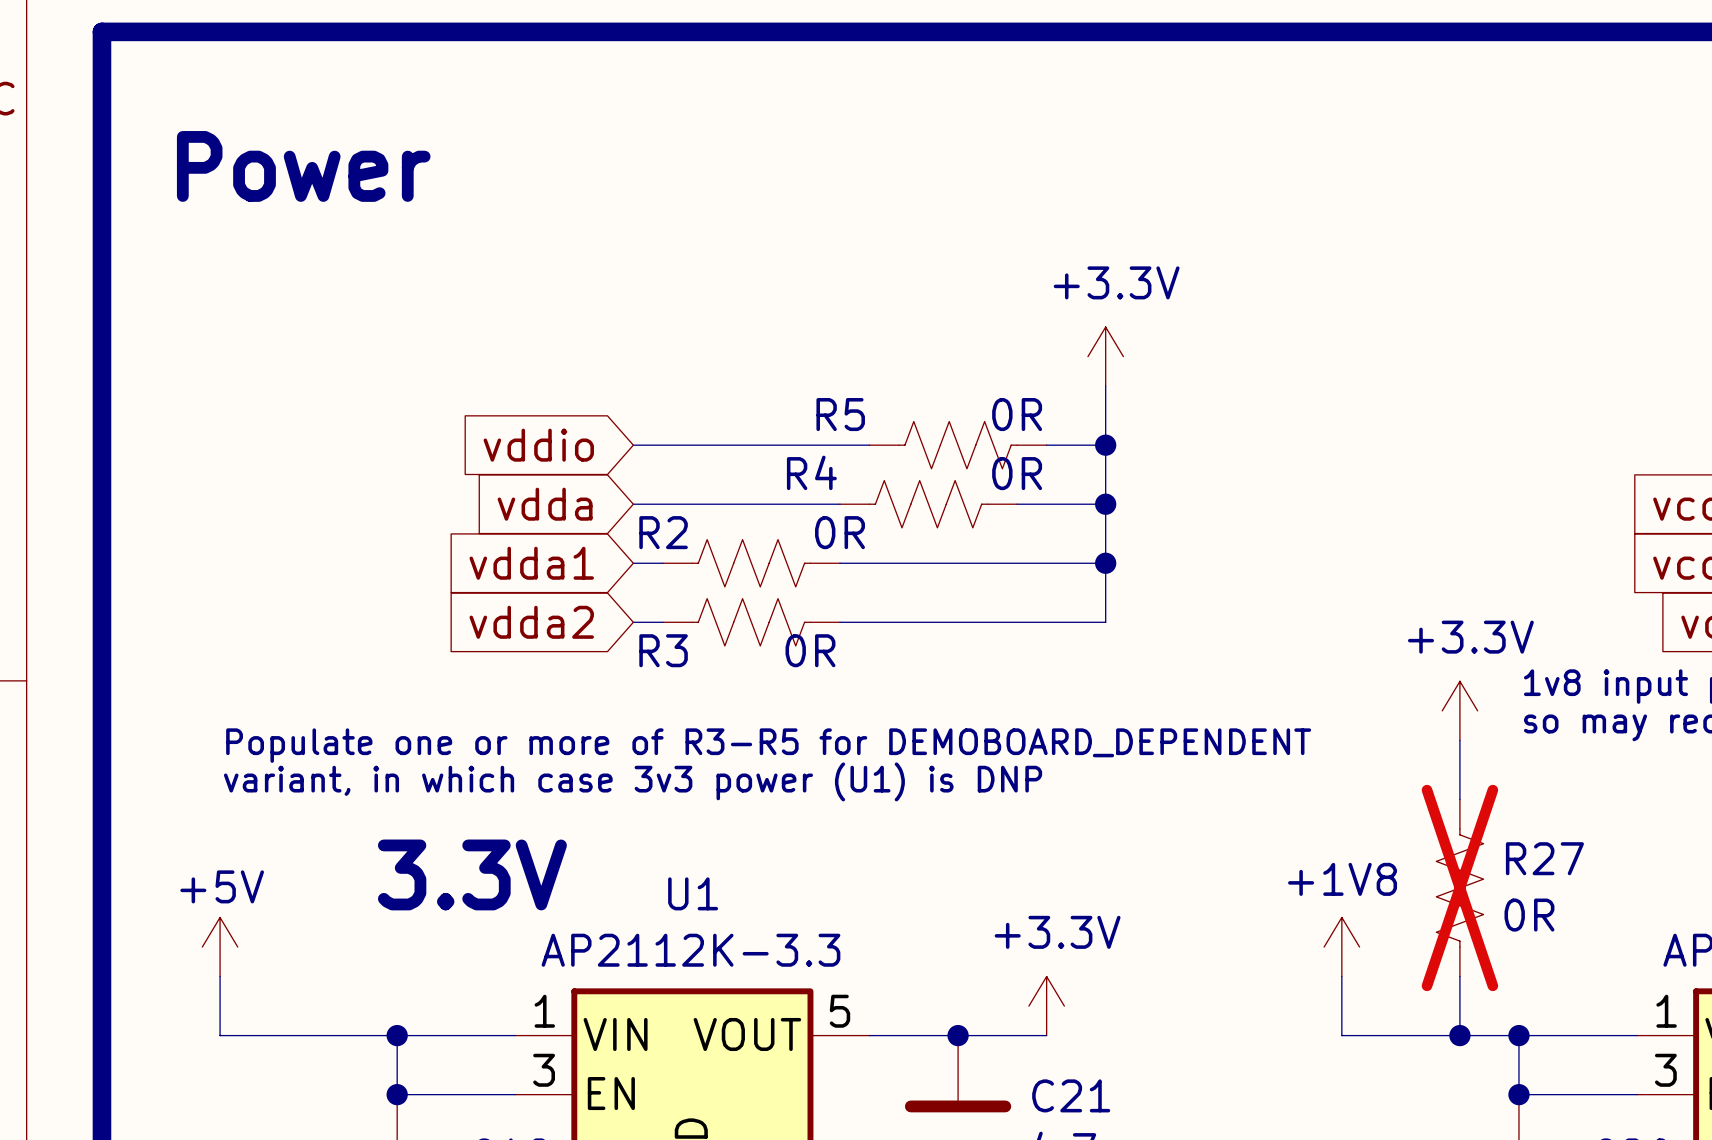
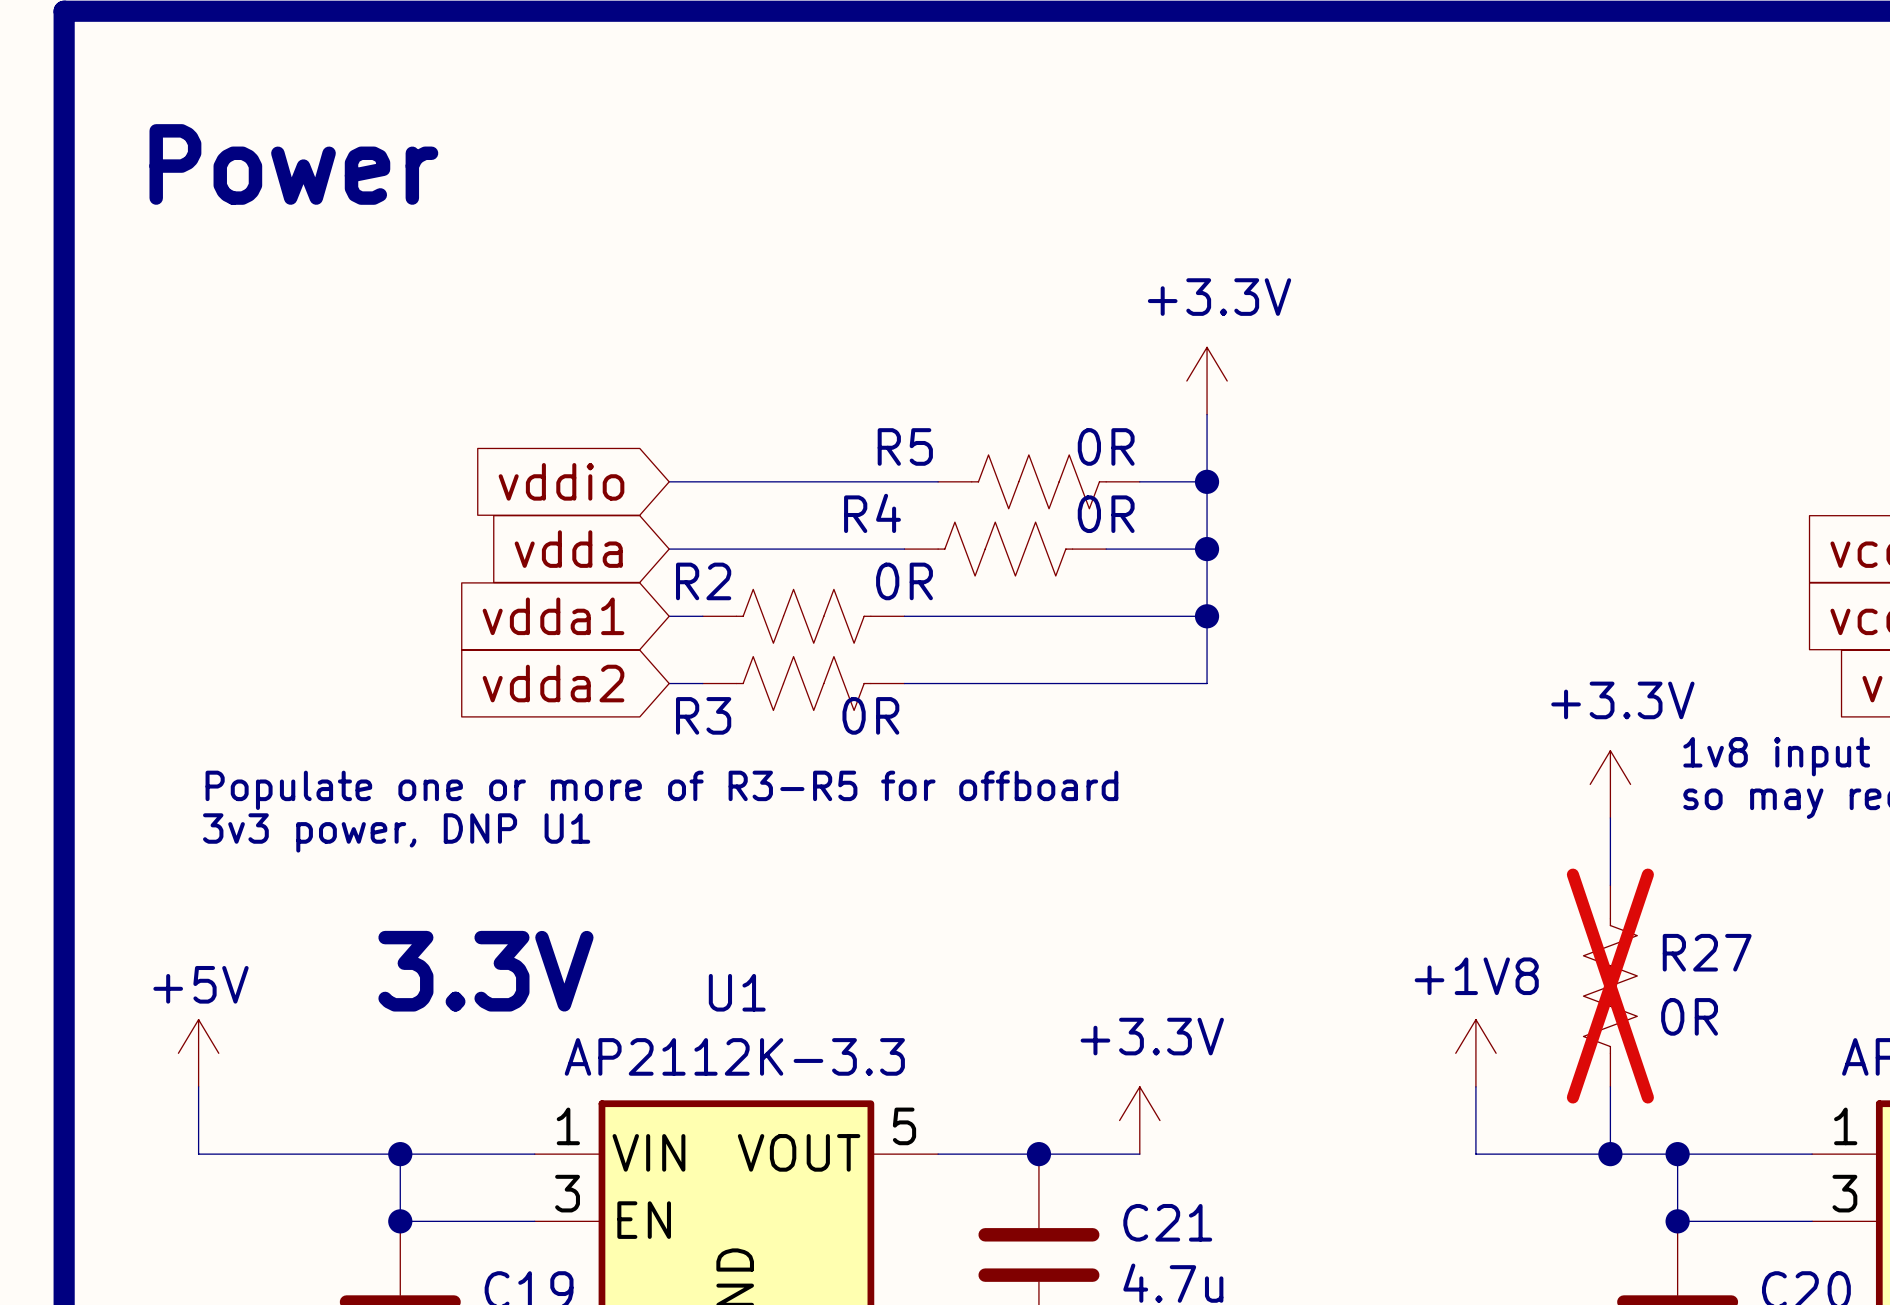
text: none -> Populate one or more of R3-R5 for offboard (661, 790)
text: Populate one or more of R3-R5 for DEMOBOARD_DEPENDENT (768, 745) -> 3v3 power, DNP U1 (396, 832)
text: variant, in which case 3v3 power (U1) is DNP (633, 781) -> none

